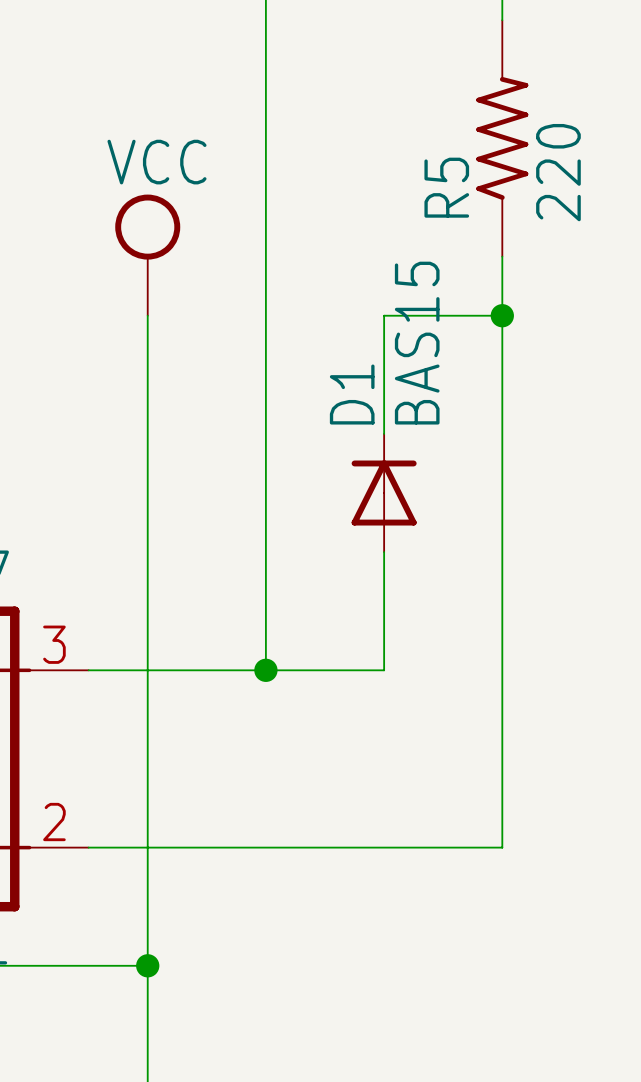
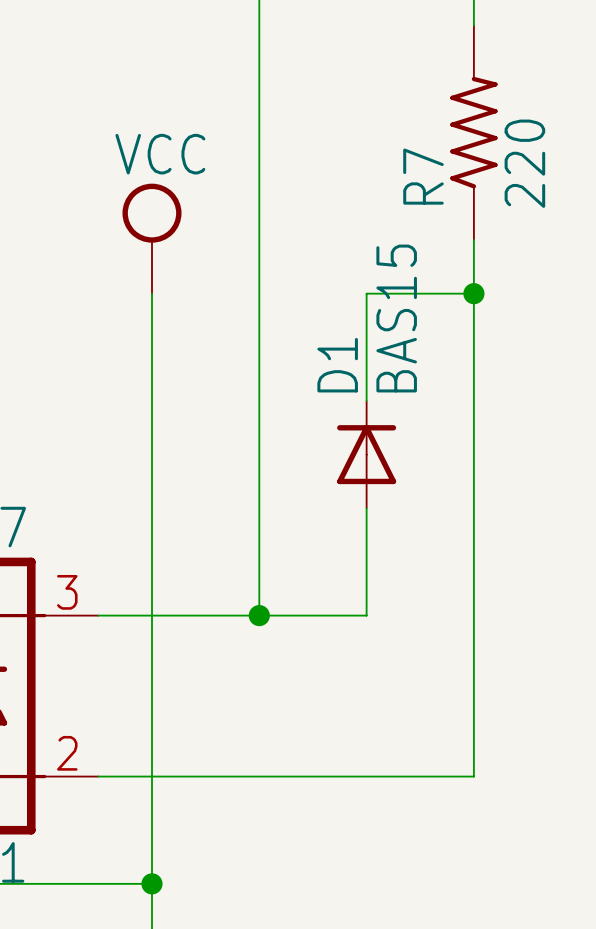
R5 name: R5 (446, 187) -> R7 (423, 176)

